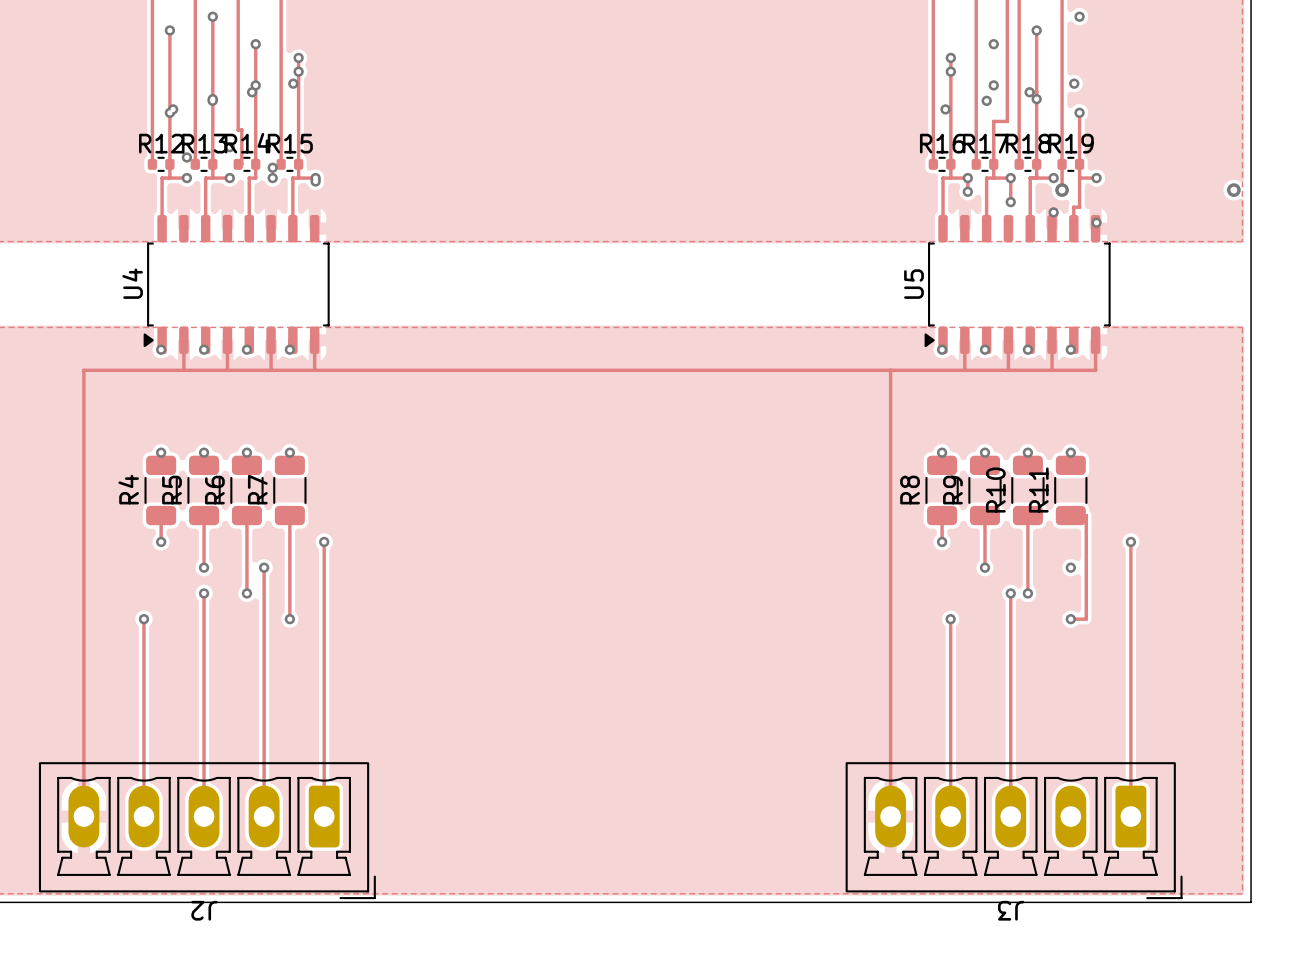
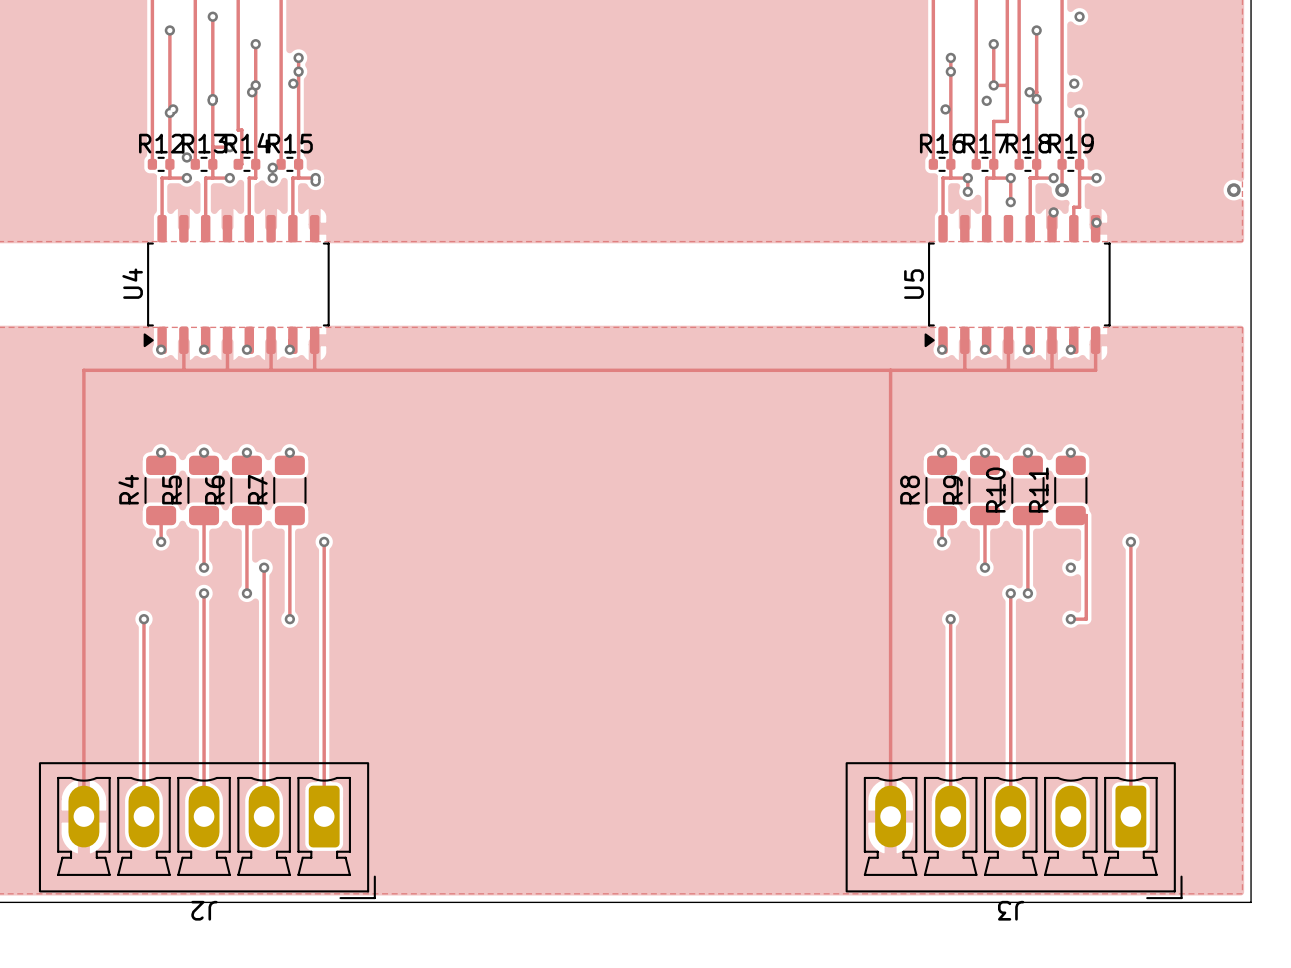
track: none -> (993, 44) (993, 85) (1007, 85)
track: none -> (212, 147) (229, 147)

